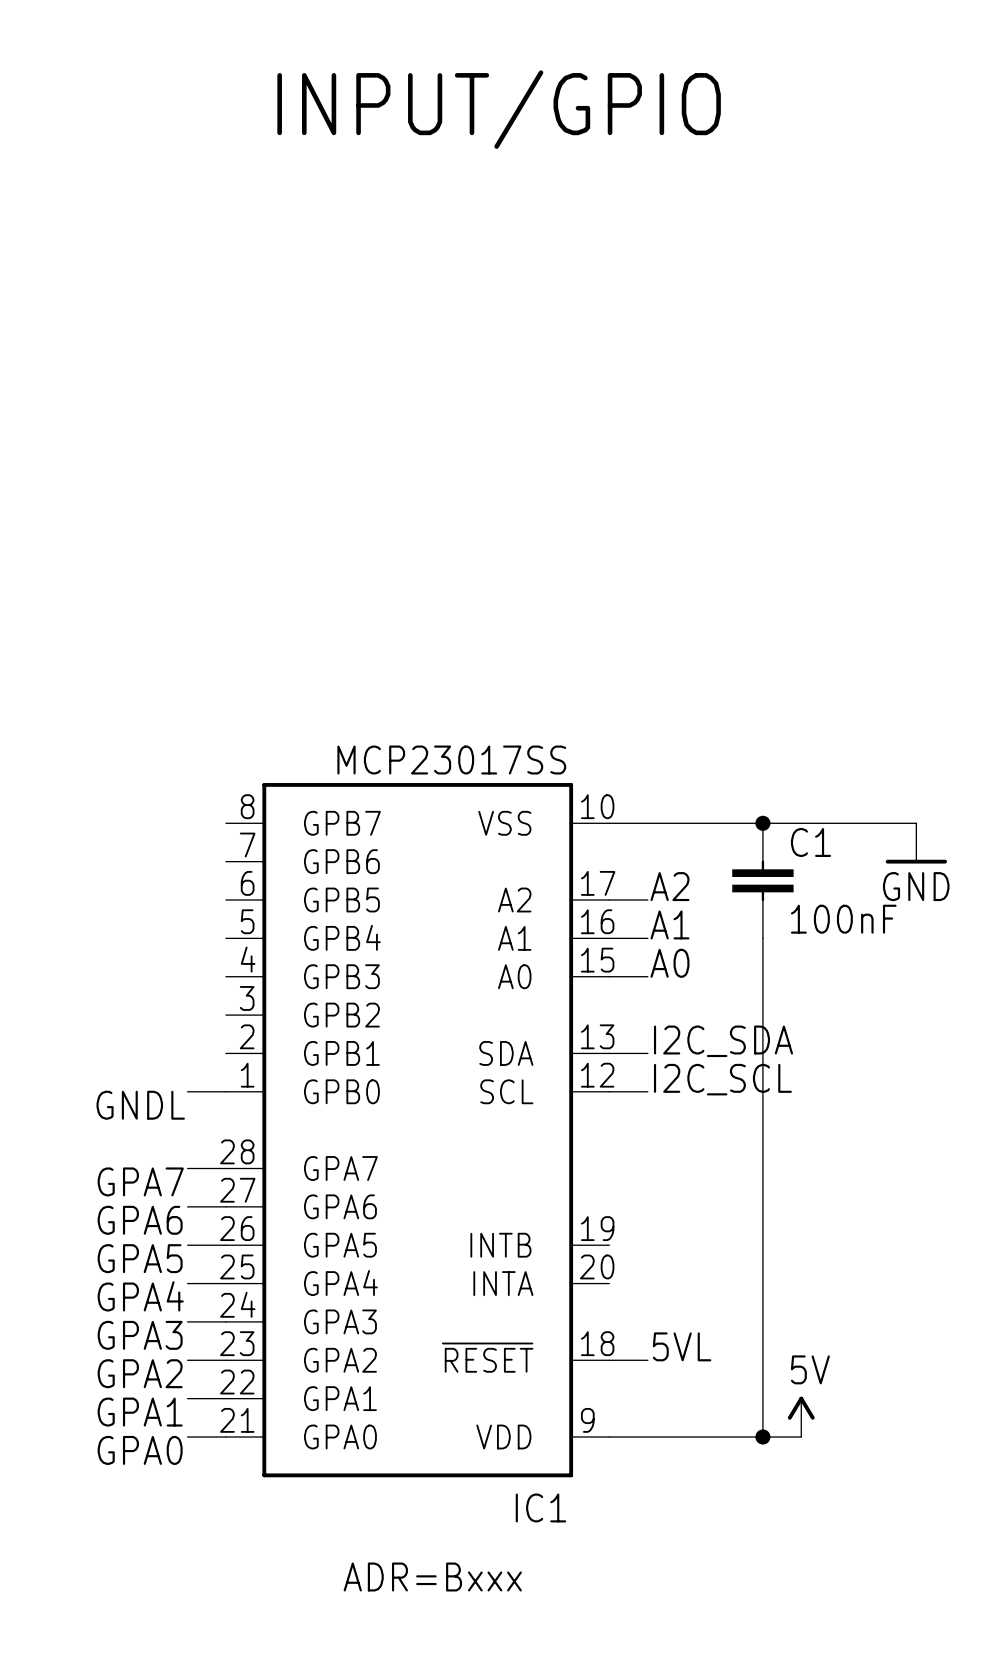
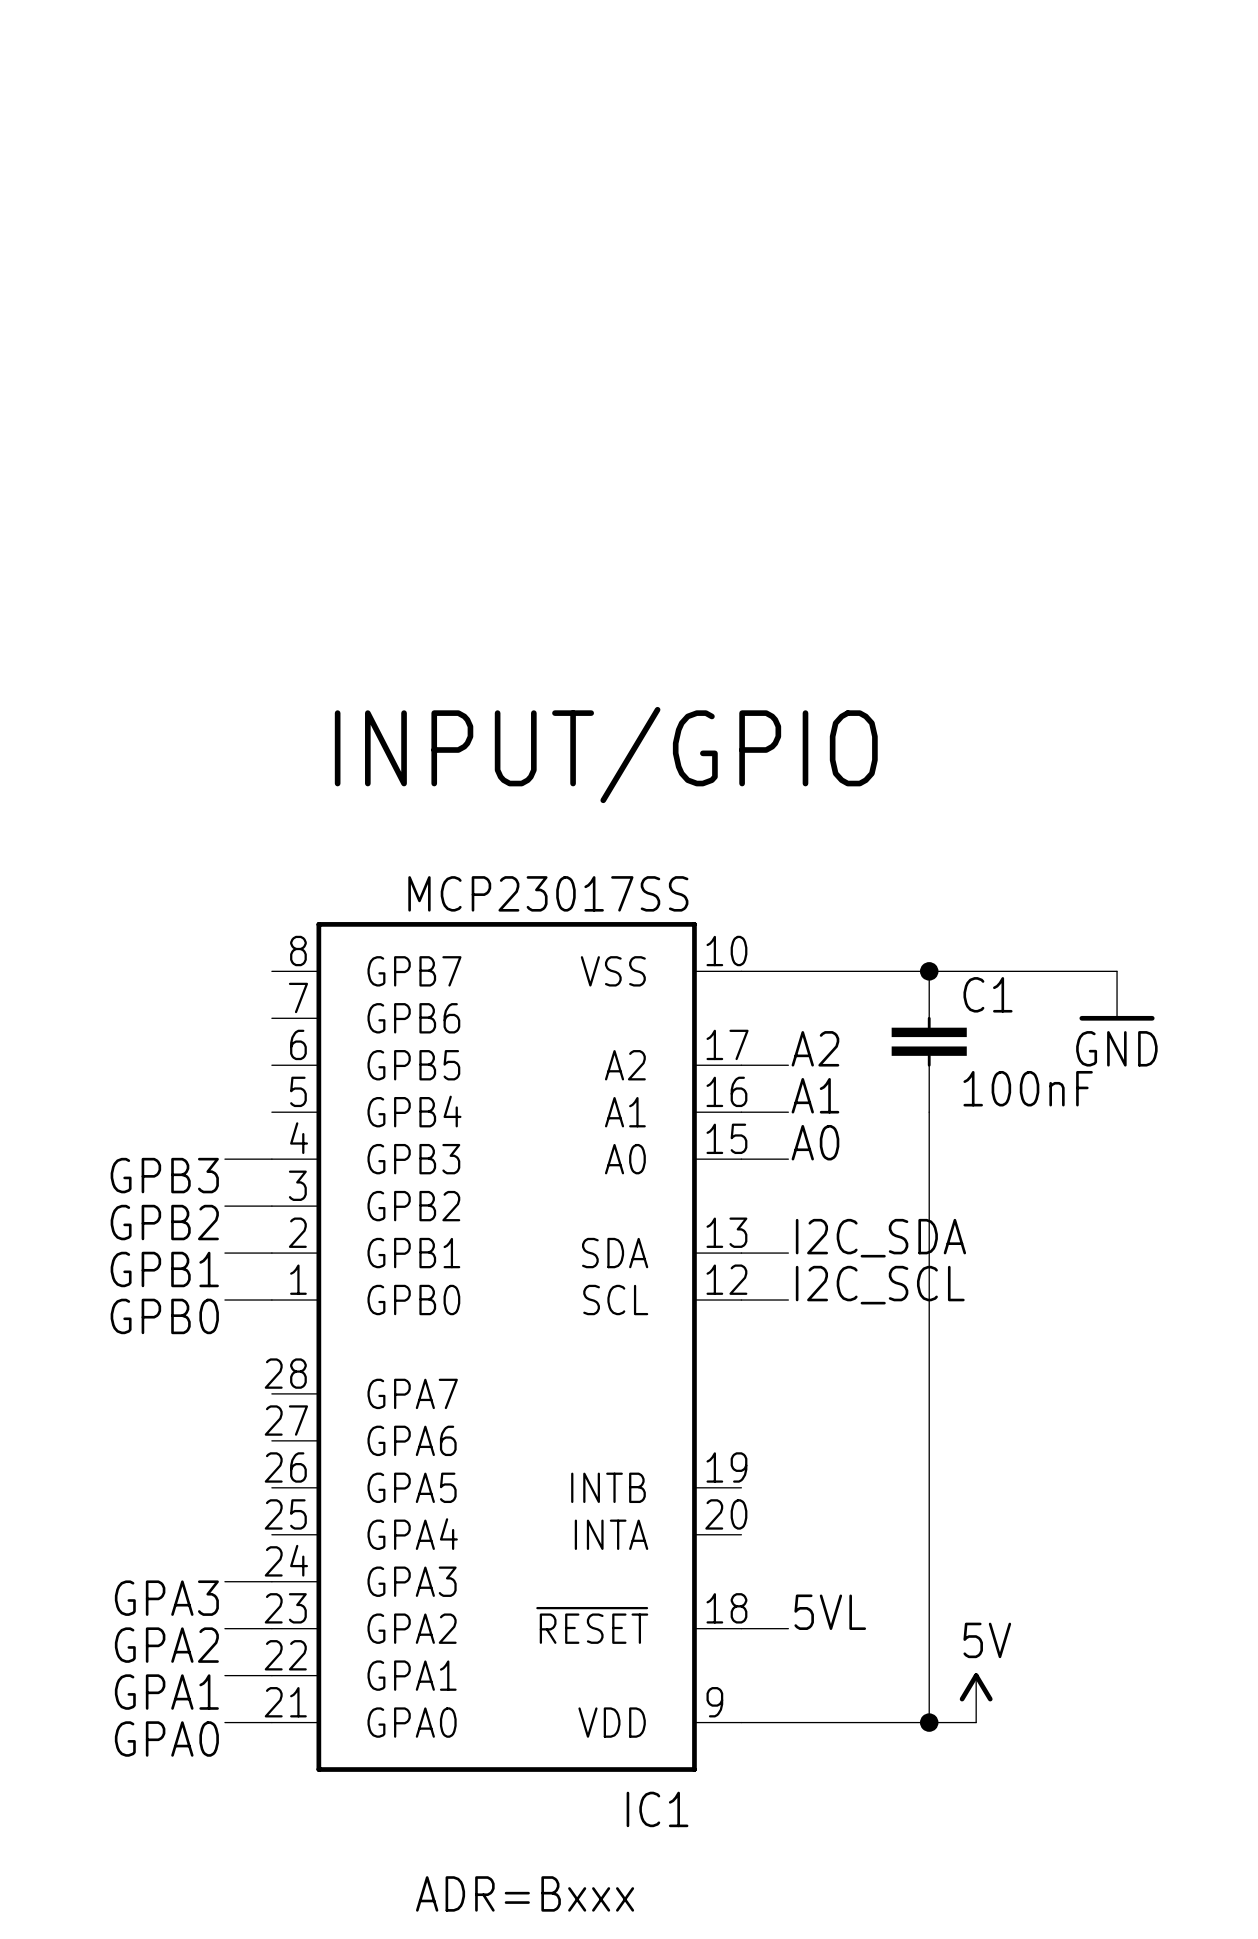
text: INPUT/GPIO (499, 109) -> none
text: none -> INPUT/GPIO (606, 755)
label: none -> GPB3 (164, 1175)
label: none -> GPB2 (164, 1222)
label: none -> GPB1 (164, 1269)
label: GNDL (140, 1105) -> GPB0 (164, 1316)
wire: (187, 1168) (225, 1168) -> (224, 1159) (271, 1159)
label: GPA7 (140, 1181) -> none
wire: (187, 1206) (225, 1206) -> (224, 1206) (271, 1206)
label: GPA6 (140, 1220) -> none
wire: (187, 1245) (225, 1245) -> (224, 1253) (271, 1253)
label: GPA5 (140, 1258) -> none
wire: (187, 1283) (225, 1283) -> none
label: GPA4 (140, 1296) -> none

